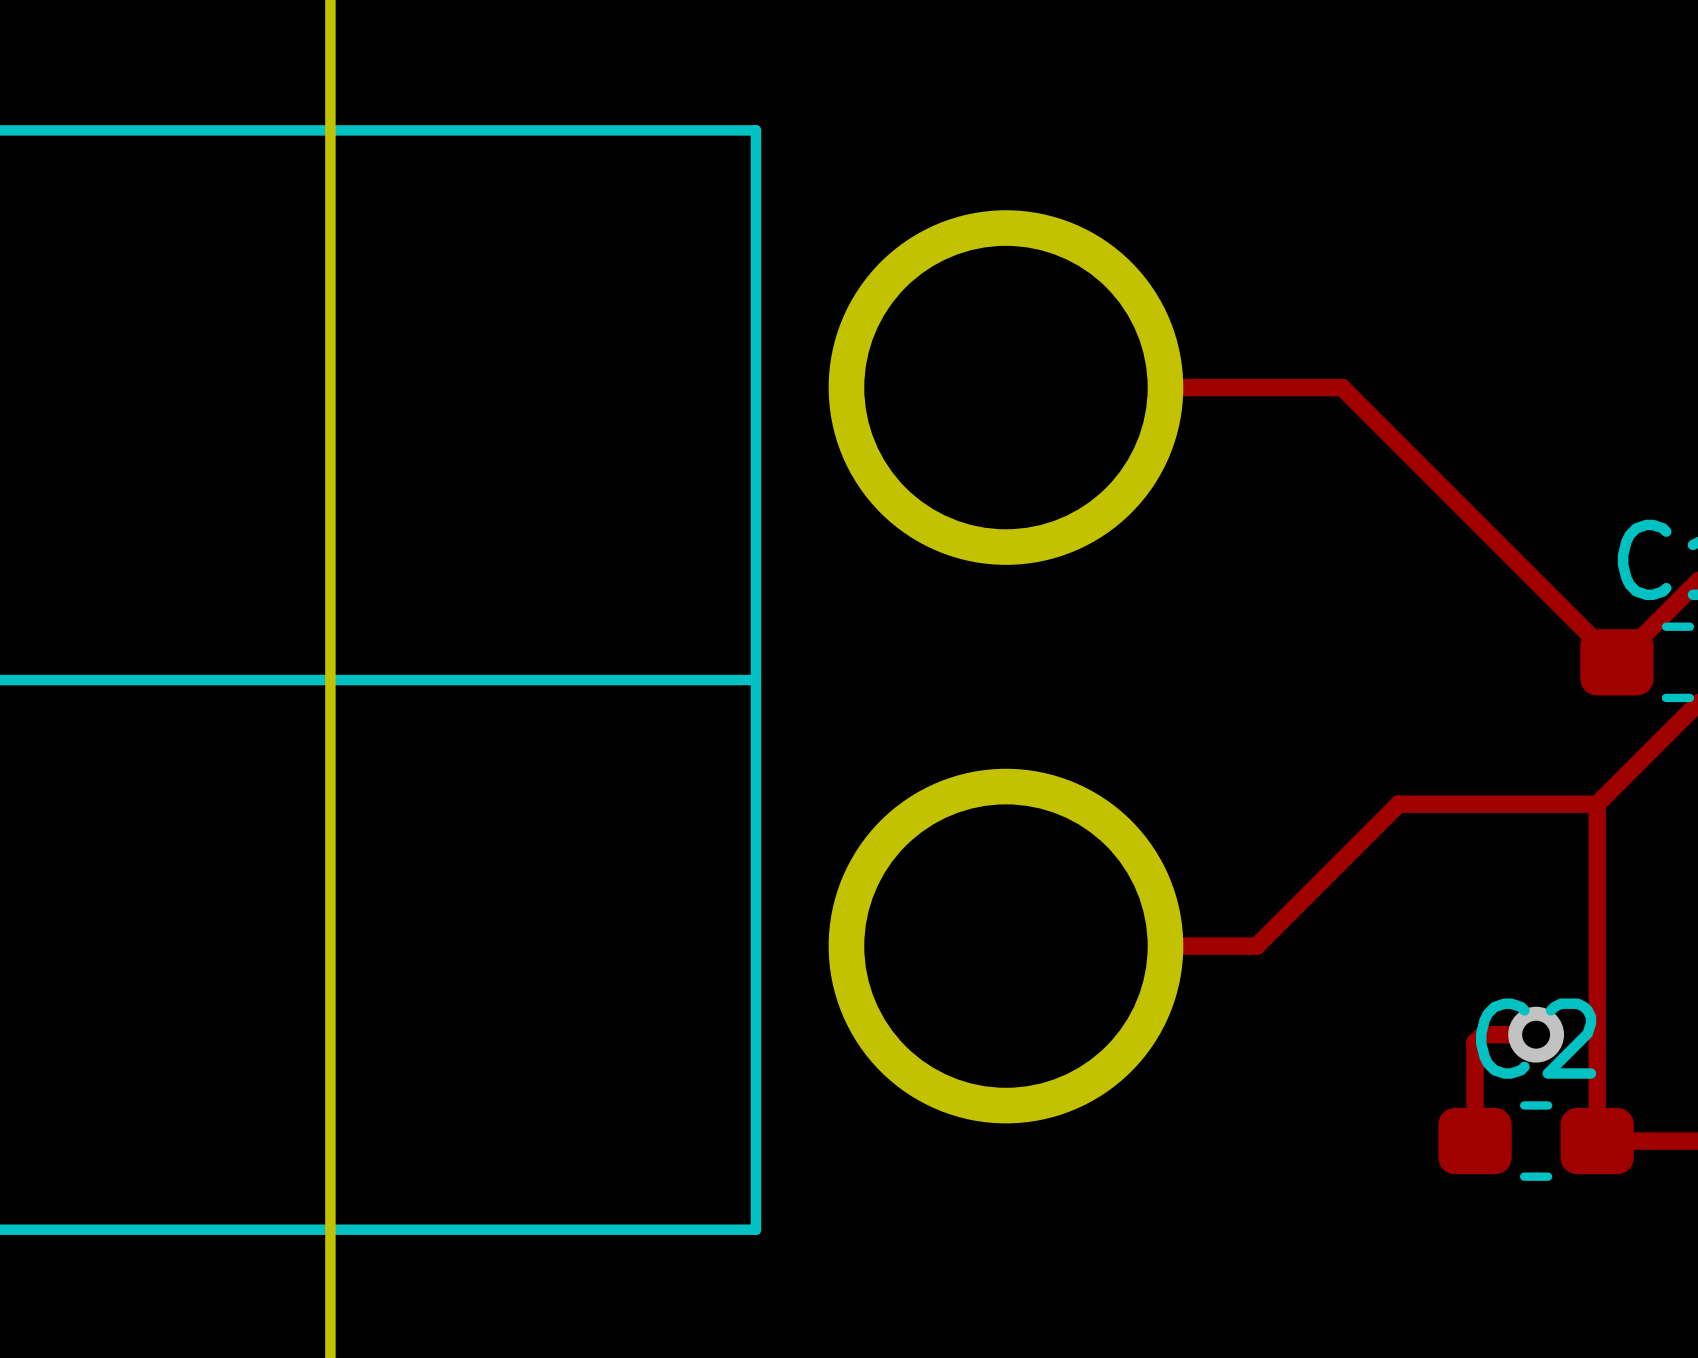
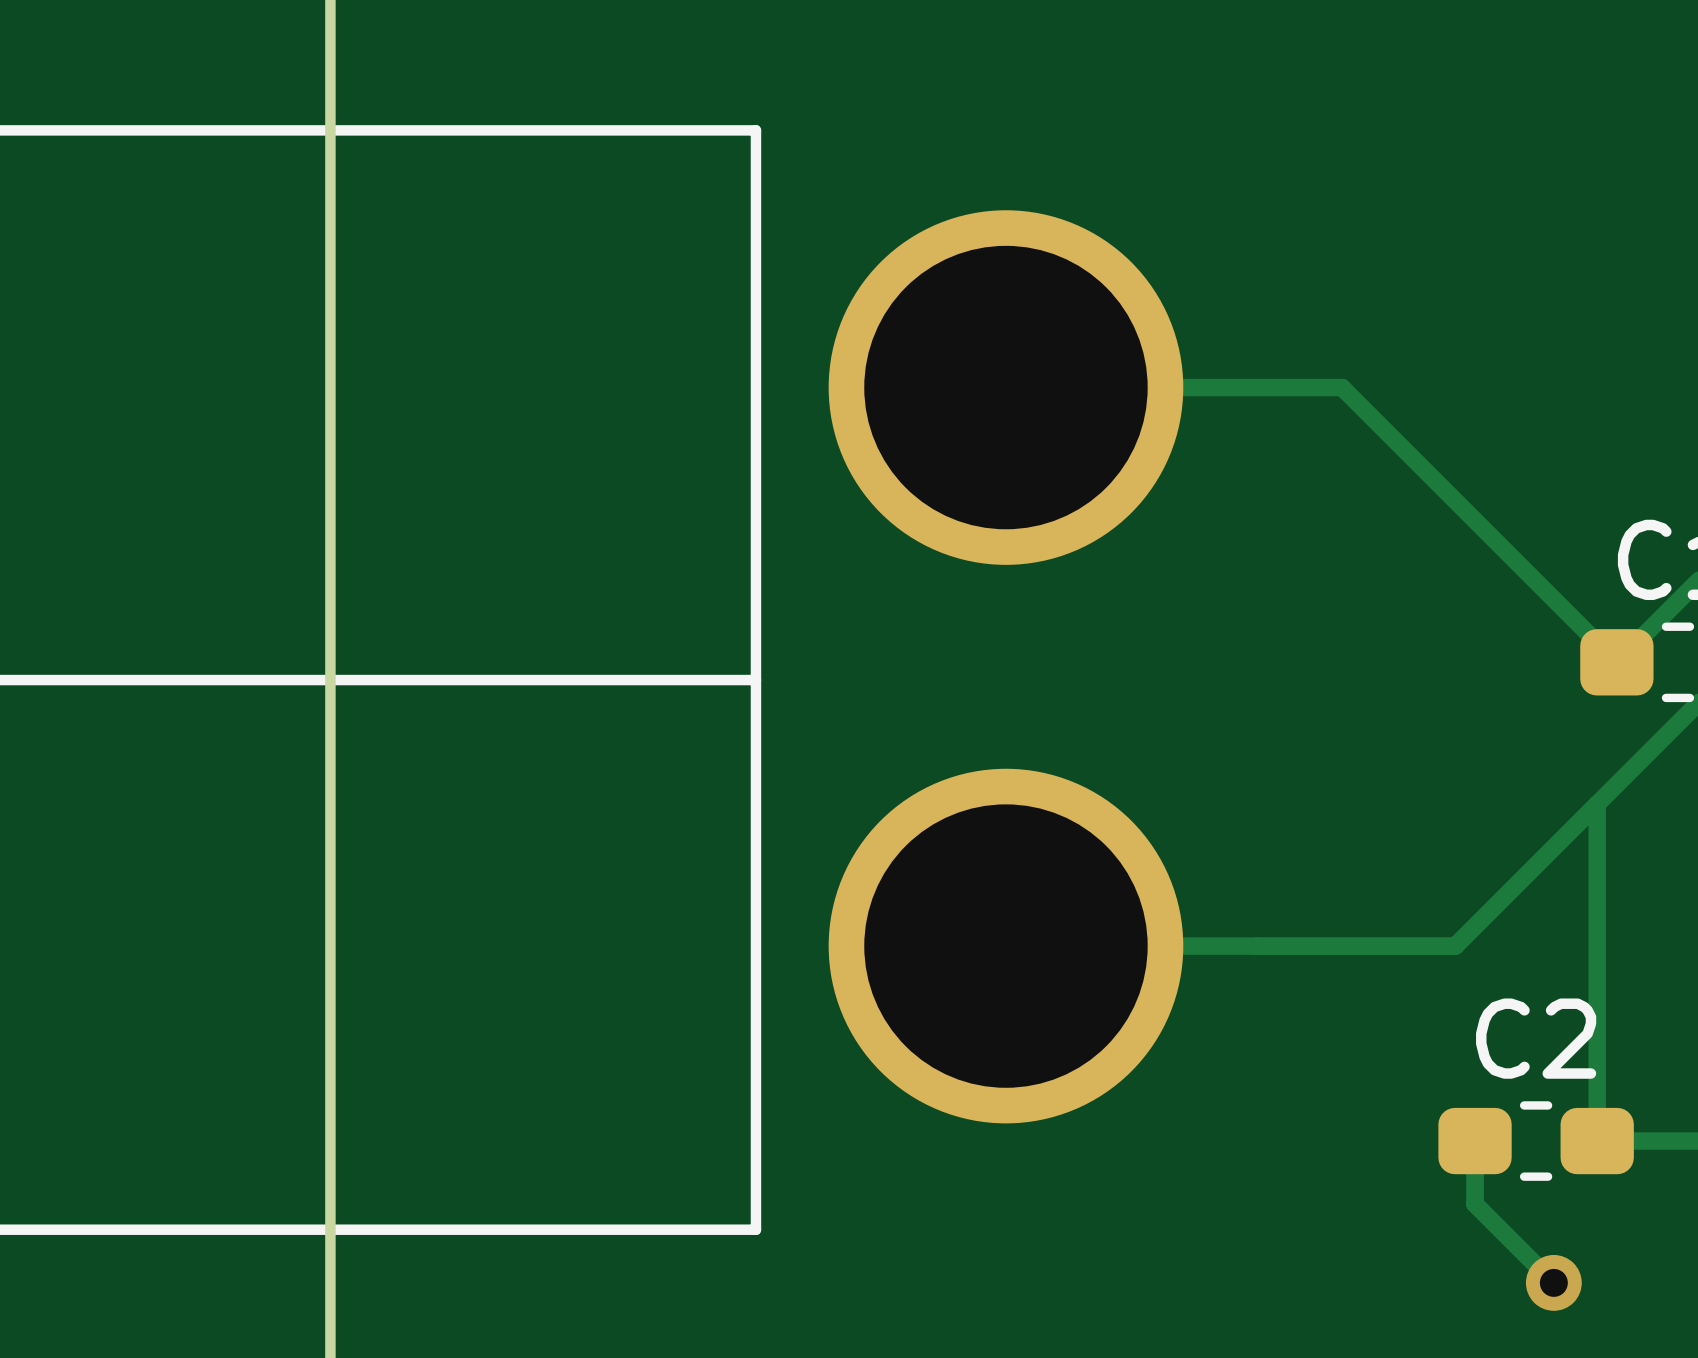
track: (1597, 804) (1398, 804) (1256, 946) -> (1597, 804) (1455, 946) (1256, 946)
track: (1536, 1034) (1482, 1034) (1475, 1042) (1475, 1141) -> (1553, 1282) (1475, 1204) (1475, 1141)
via: (1536, 1034) -> none
via: none -> (1553, 1282)

